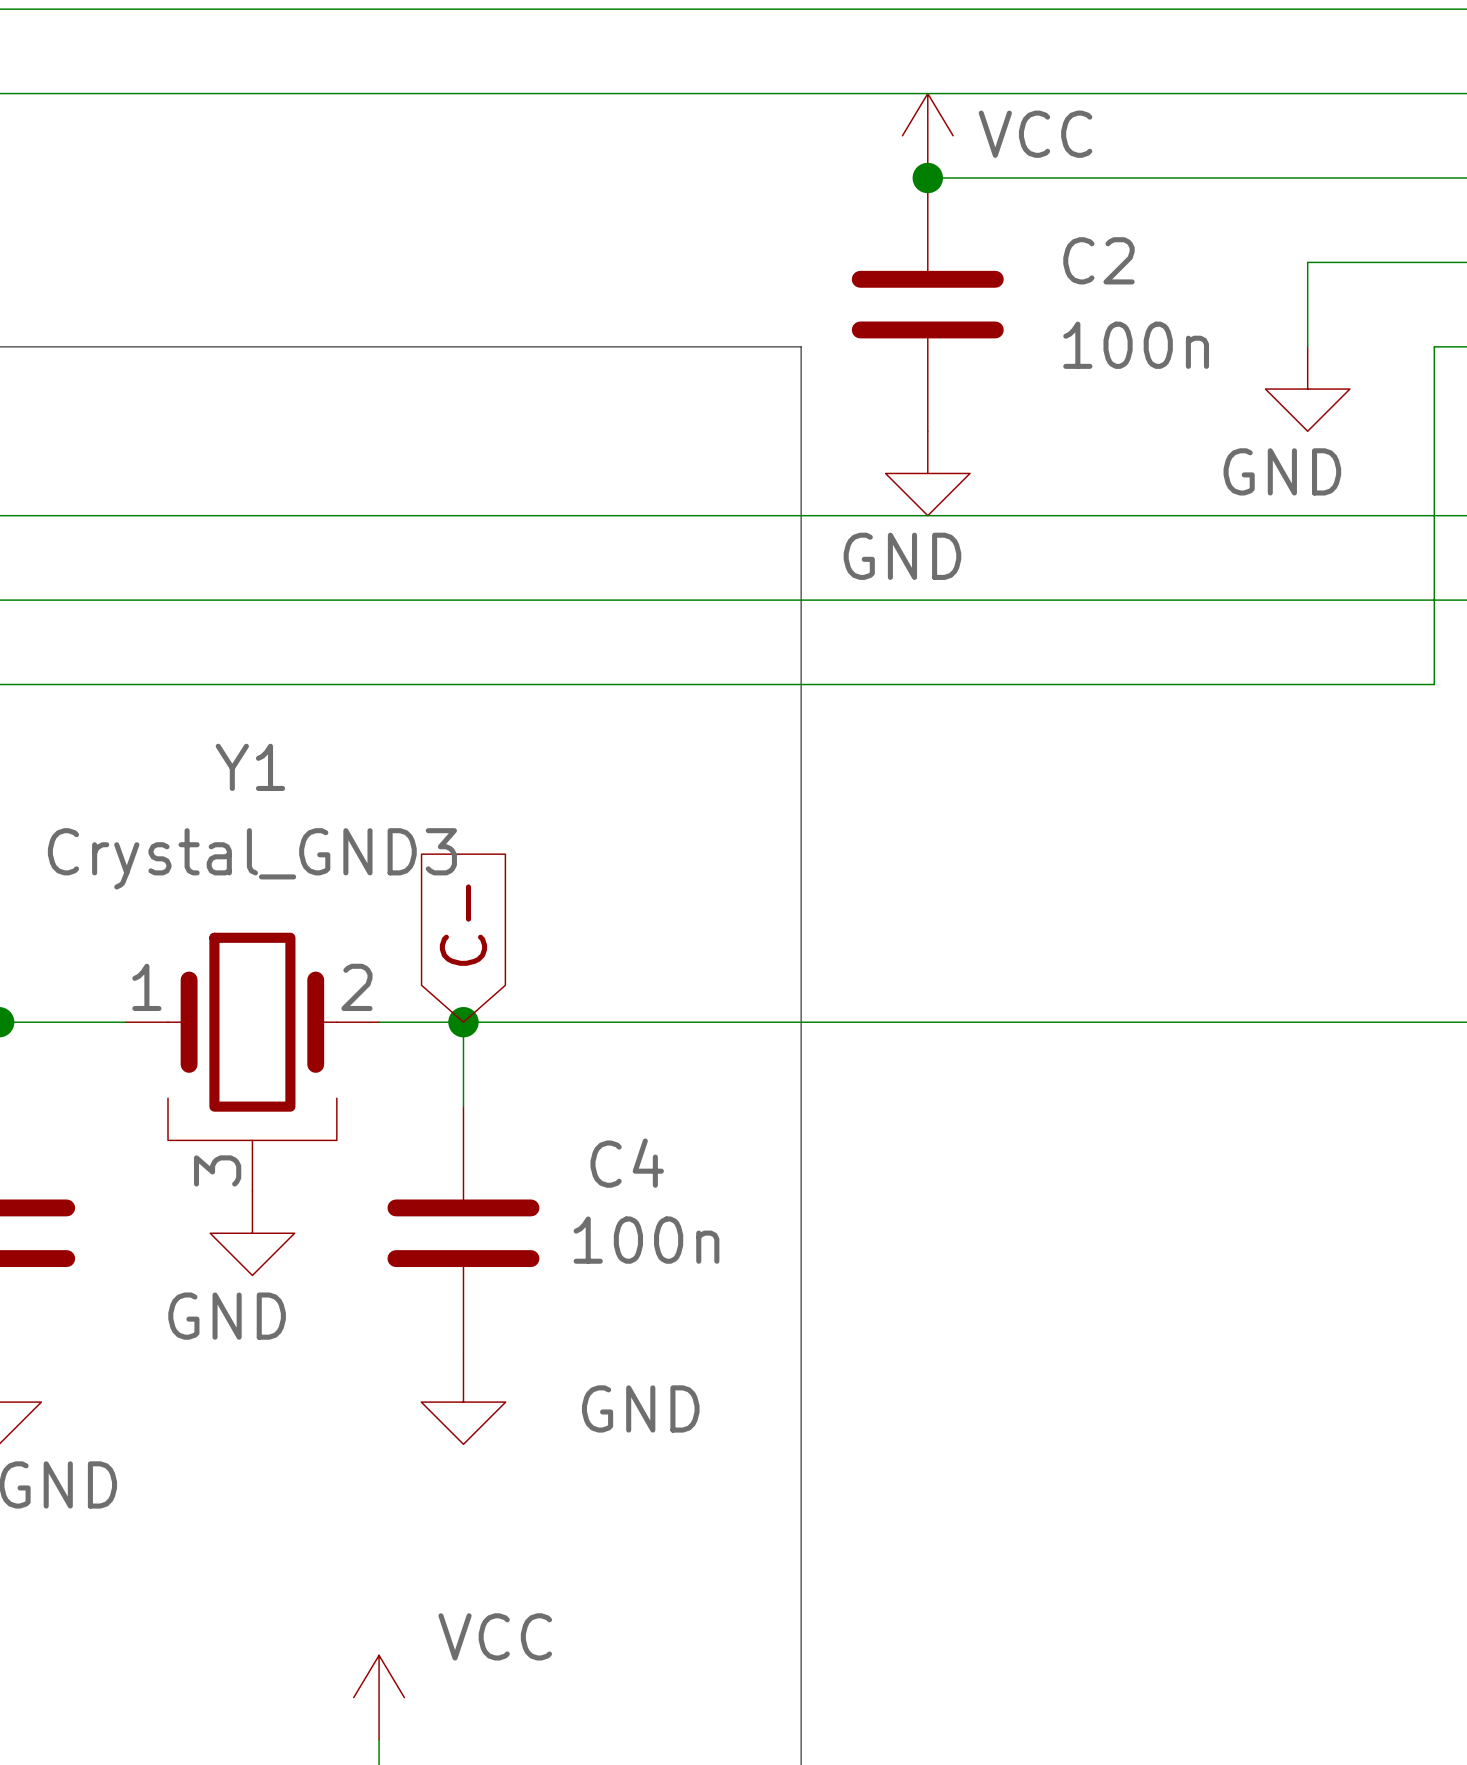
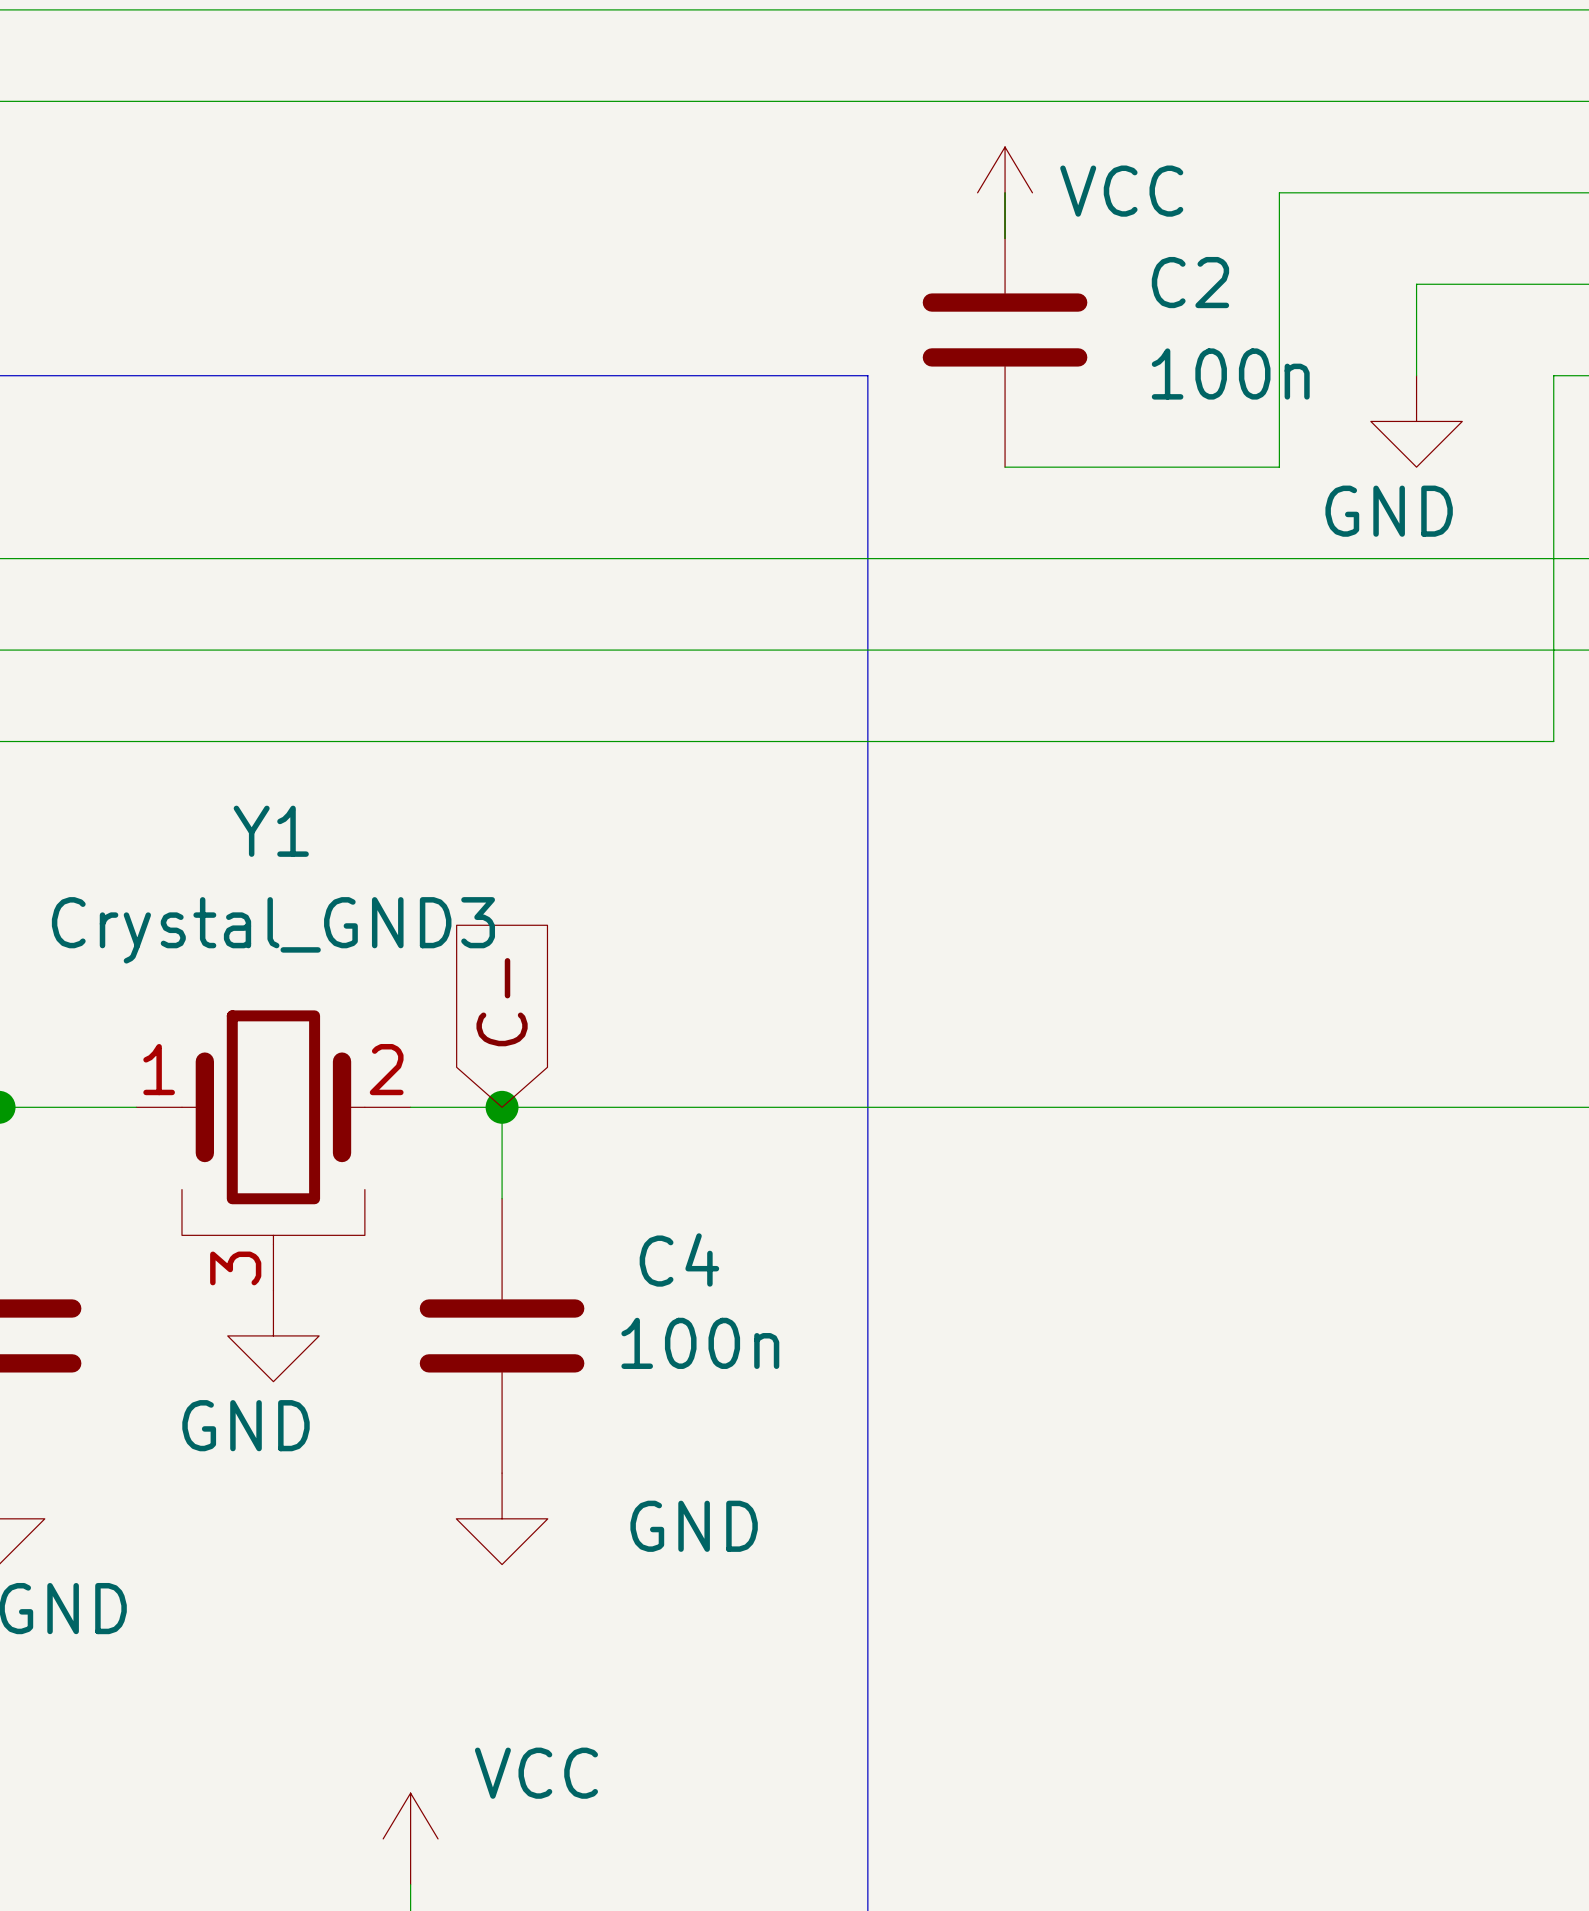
power symbol position: VCC (927, 135) -> VCC (1005, 192)
wire: (927, 177) (1181, 177) -> (1005, 467) (1279, 467) (1279, 192)
junction: (927, 177) -> none
power symbol: GND (927, 473) -> none

